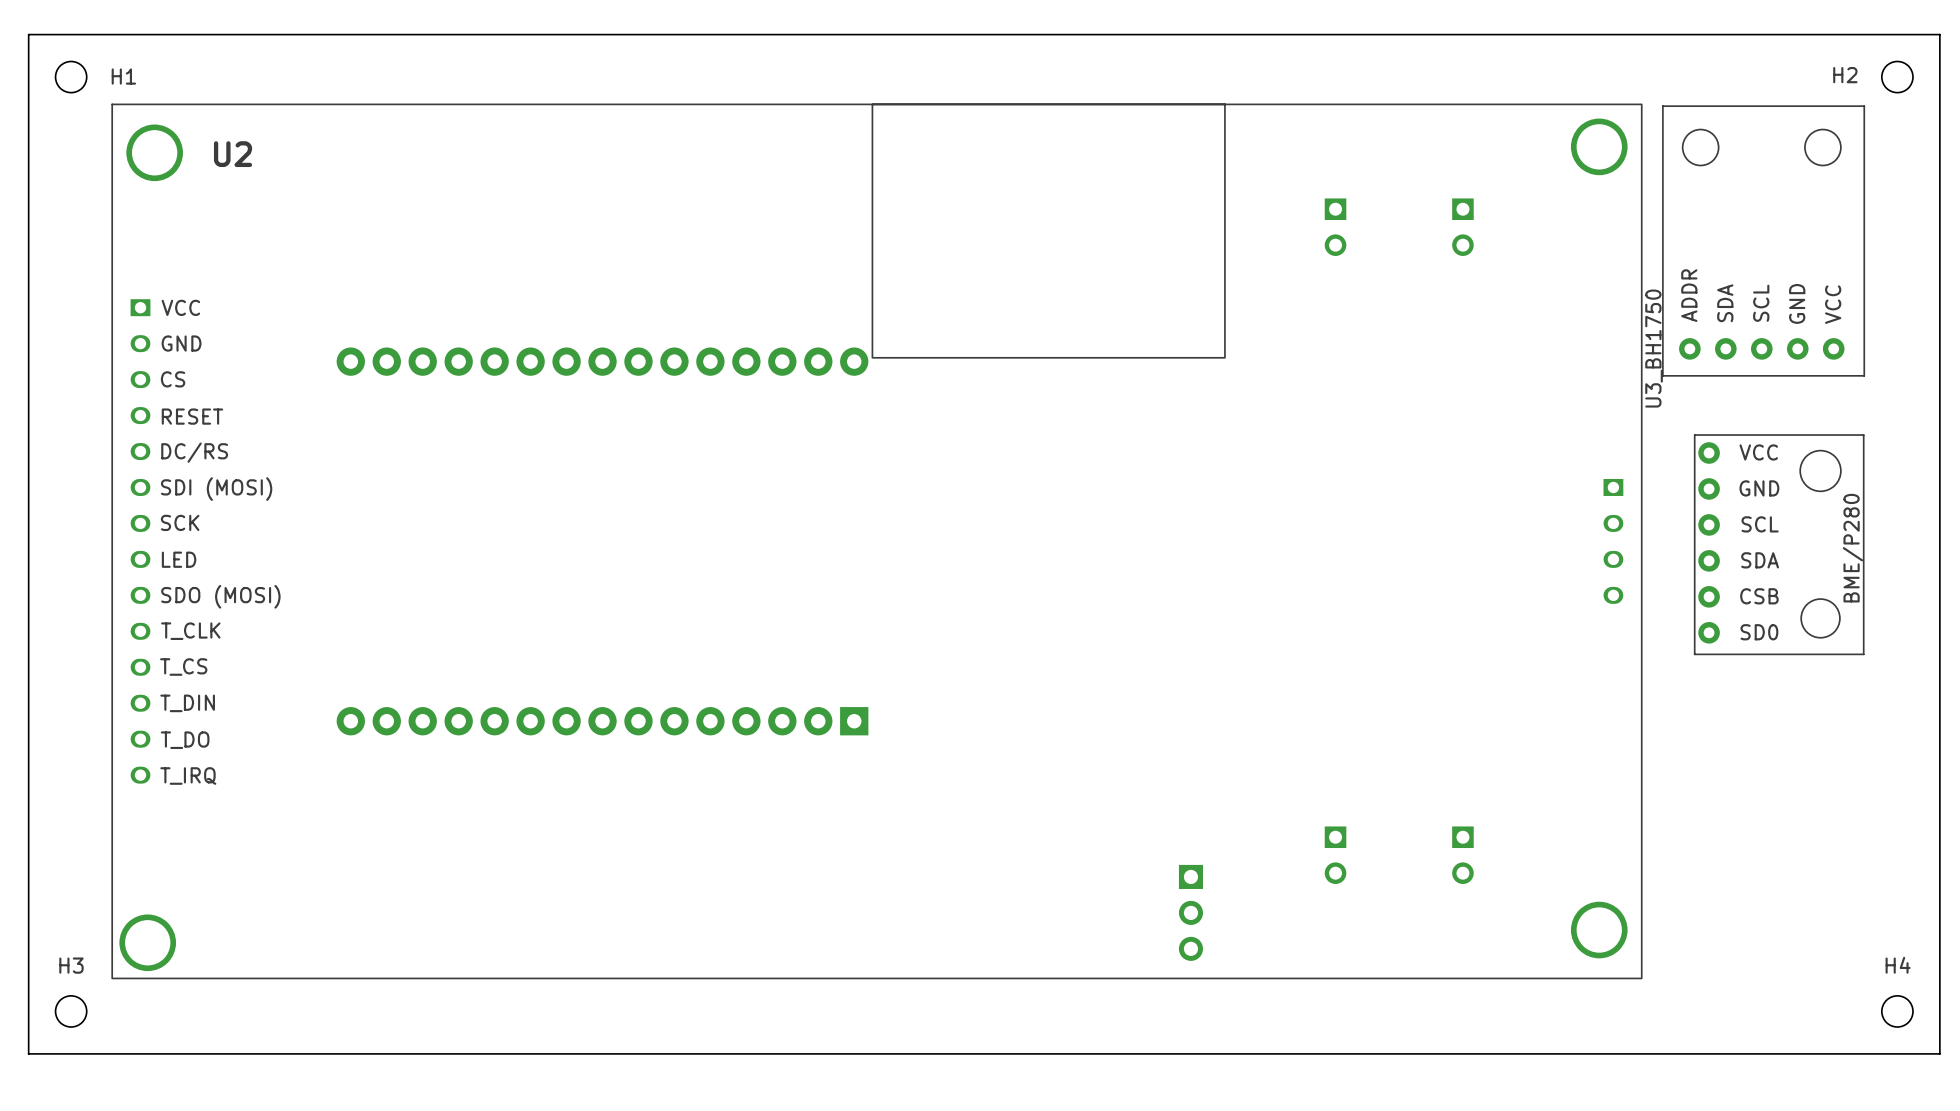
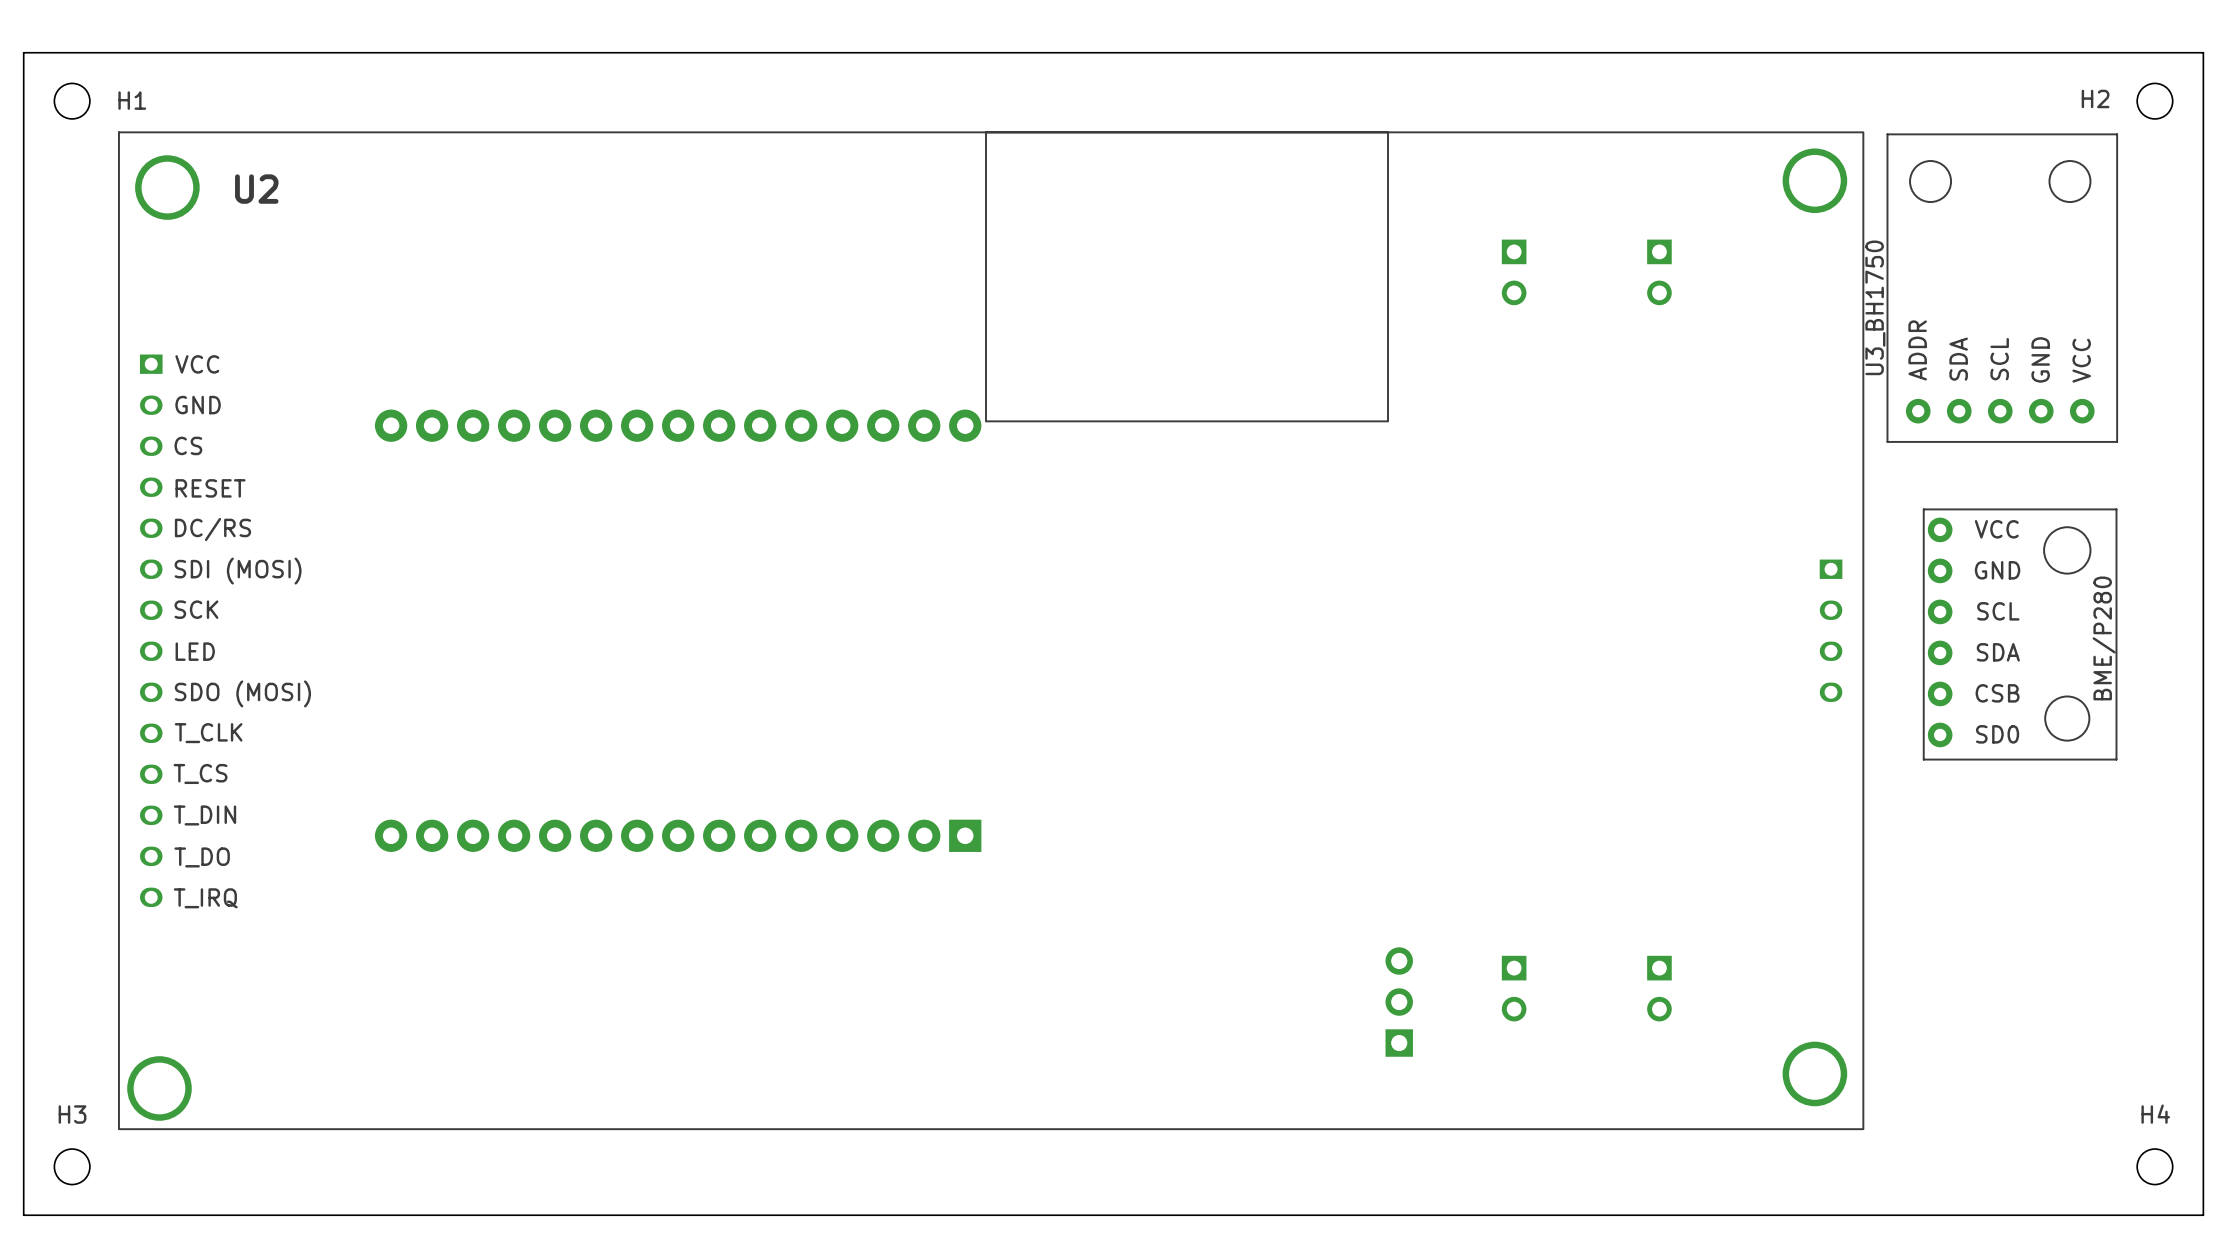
U3_BH1750 name position: U3_BH1750 (1654, 348) -> U3_BH1750 (1875, 307)
part rotation: 0° (1190, 912) -> 180° (1399, 1002)
part position: (1190, 912) -> (1399, 1002)

